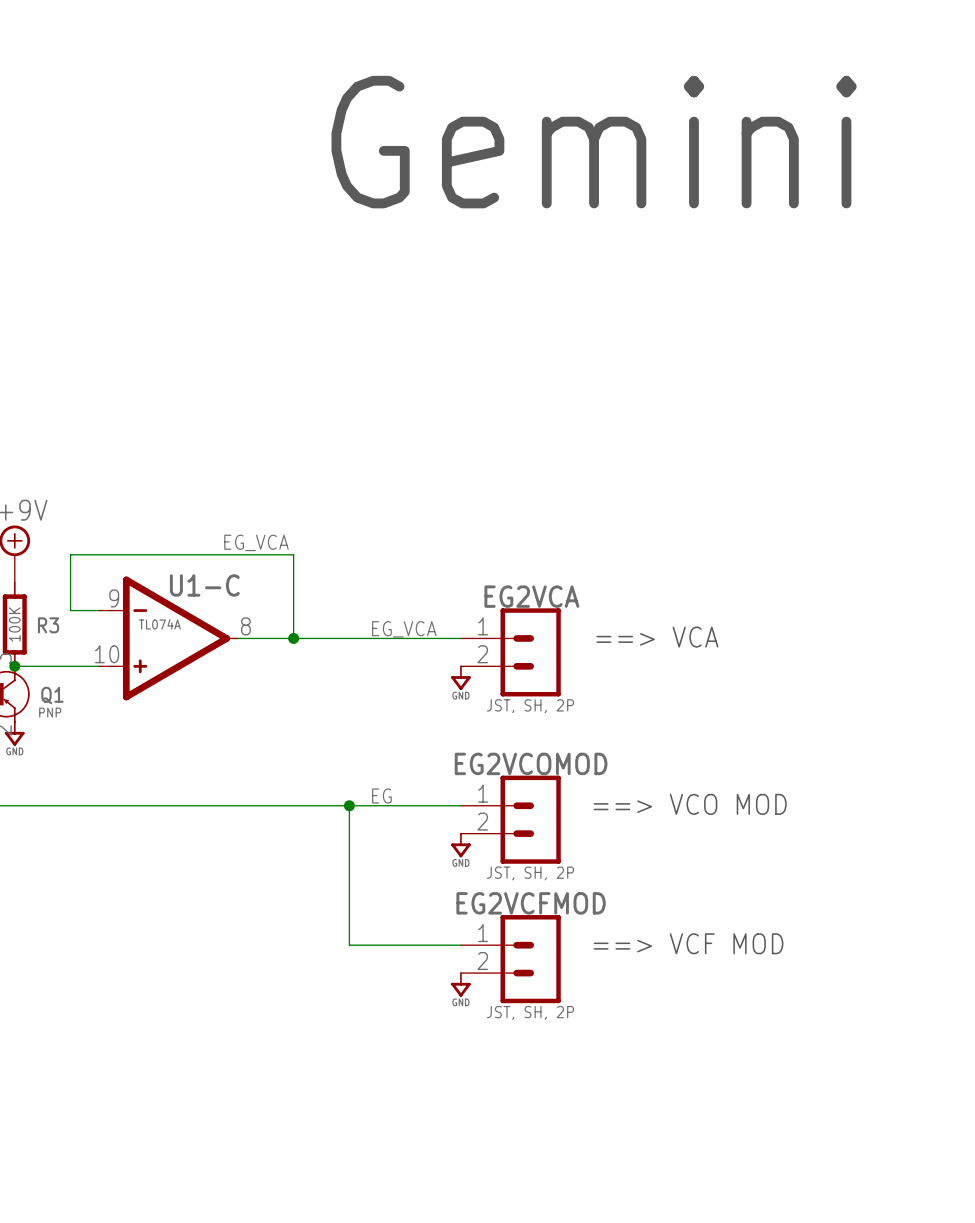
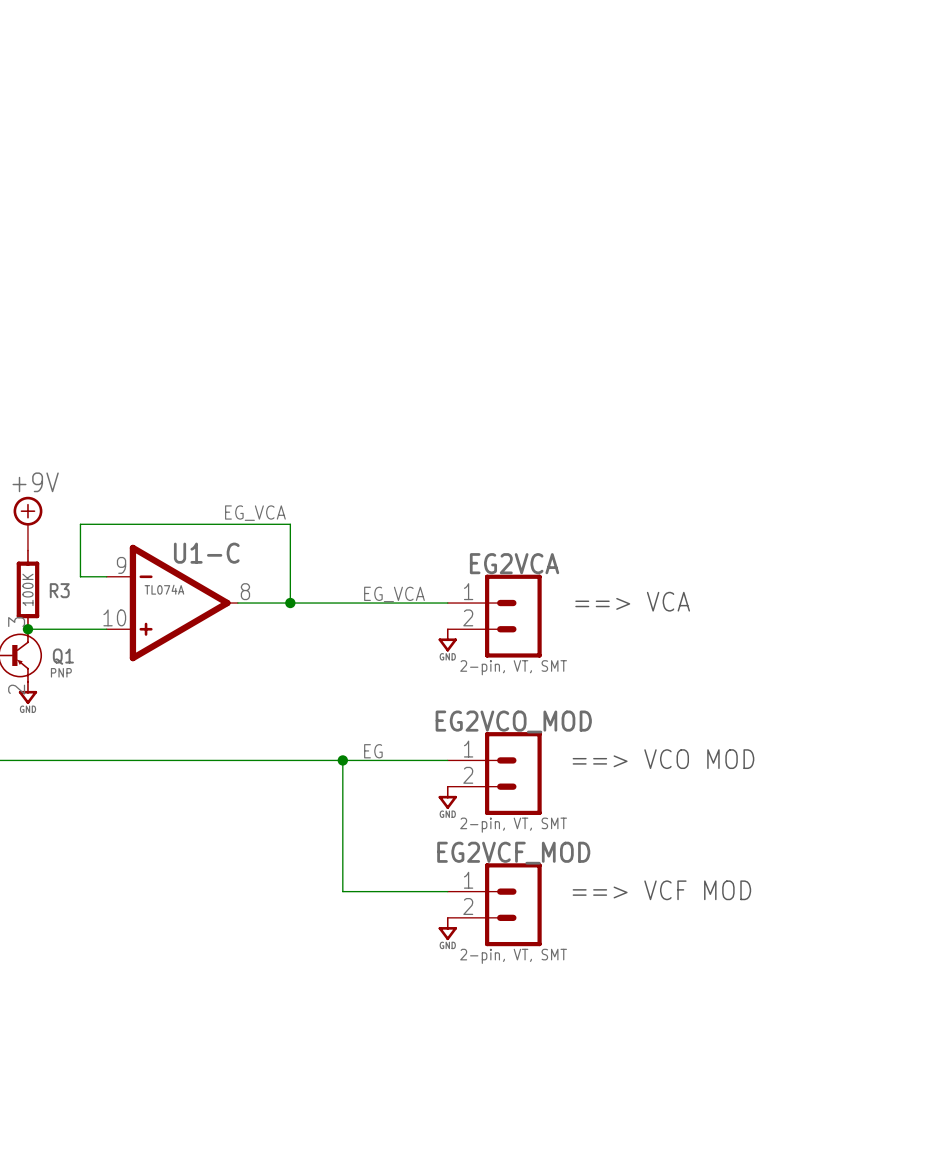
text: Gemini (594, 142) -> none
EG2VCA value: JST, SH, 2P (530, 706) -> 2-pin, VT, SMT (513, 667)
EG2VCOMOD name: EG2VCOMOD (531, 763) -> EG2VCO_MOD (513, 721)
EG2VCOMOD value: JST, SH, 2P (530, 873) -> 2-pin, VT, SMT (513, 825)
EG2VCFMOD name: EG2VCFMOD (531, 903) -> EG2VCF_MOD (513, 853)
EG2VCFMOD value: JST, SH, 2P (530, 1012) -> 2-pin, VT, SMT (513, 956)

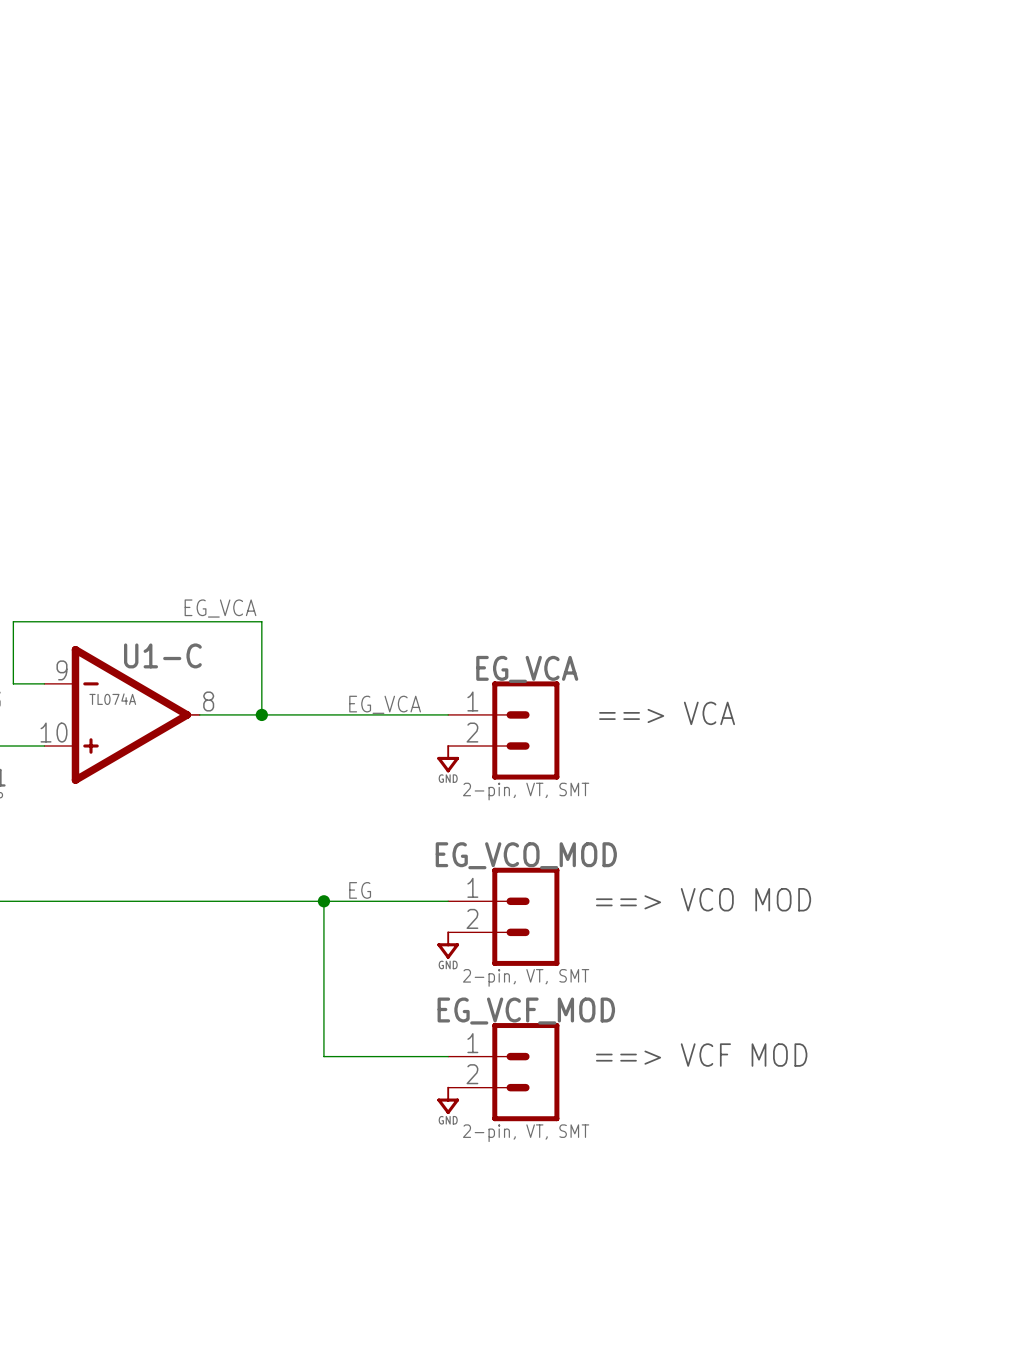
EG2VCA name: EG2VCA (514, 563) -> EG_VCA (527, 669)
EG2VCO_MOD name: EG2VCO_MOD (513, 721) -> EG_VCO_MOD (526, 855)
EG2VCF_MOD name: EG2VCF_MOD (513, 853) -> EG_VCF_MOD (526, 1011)

